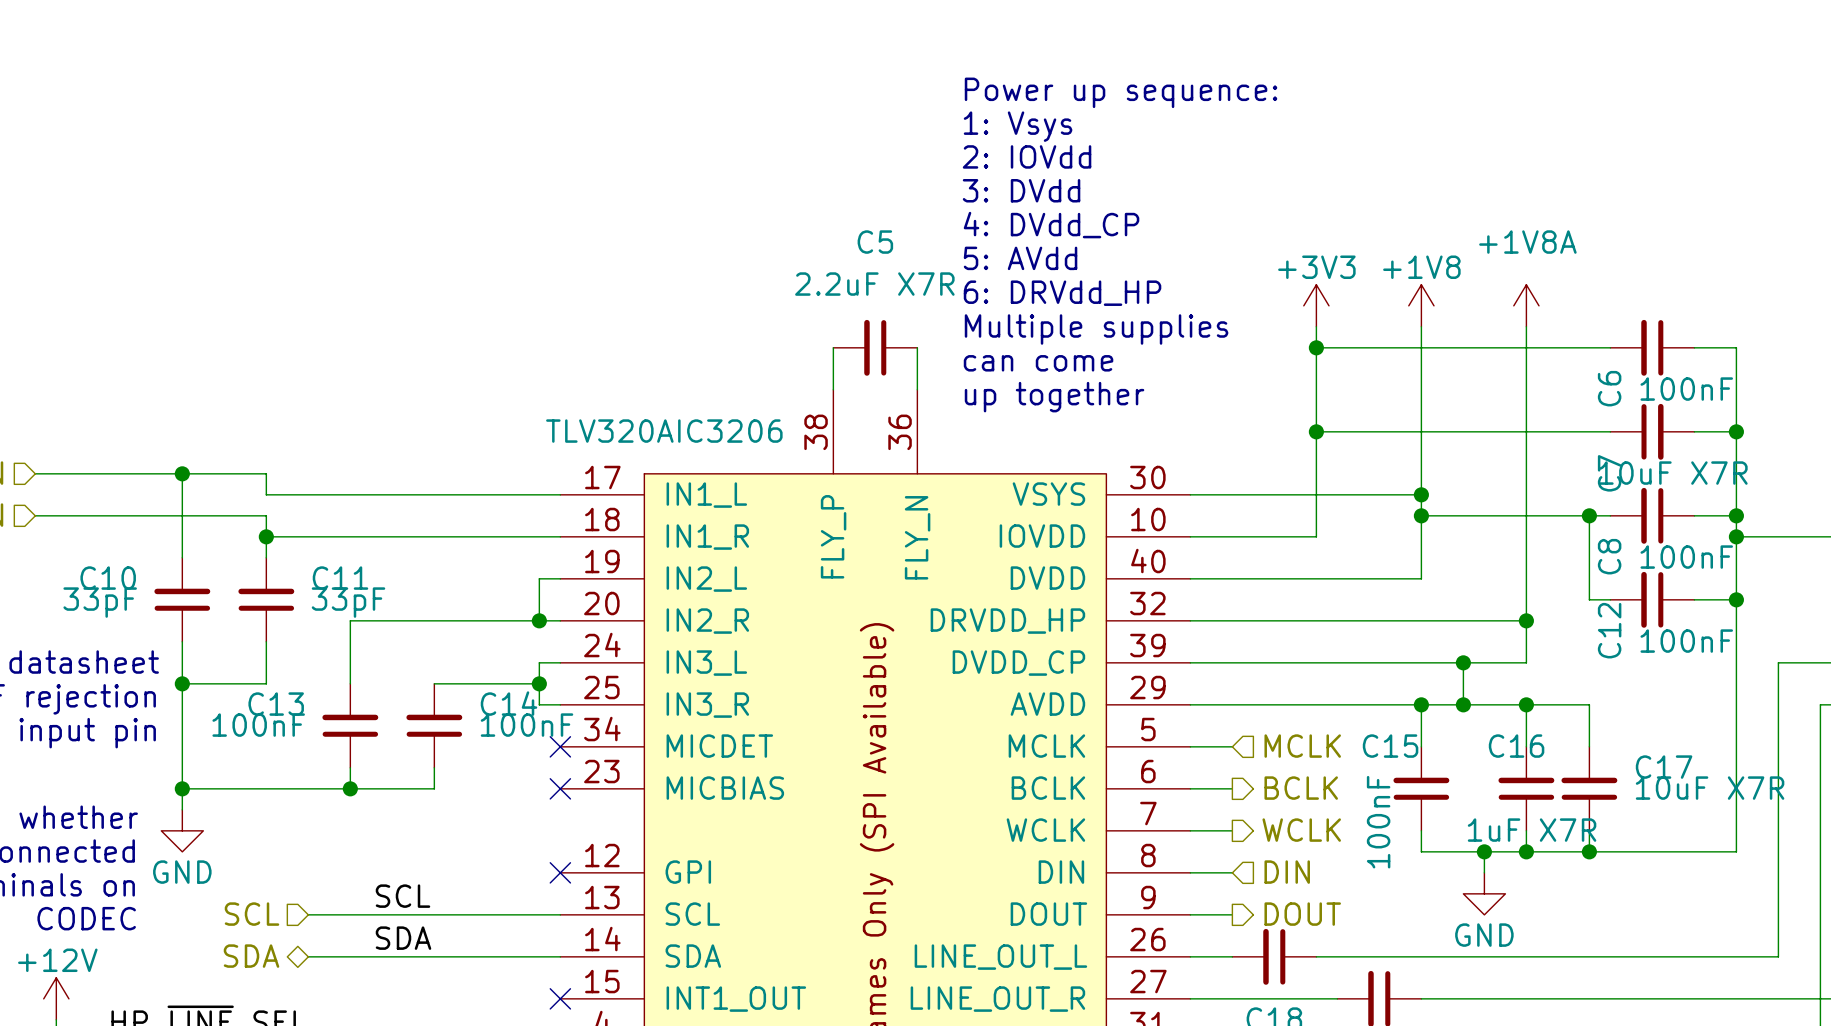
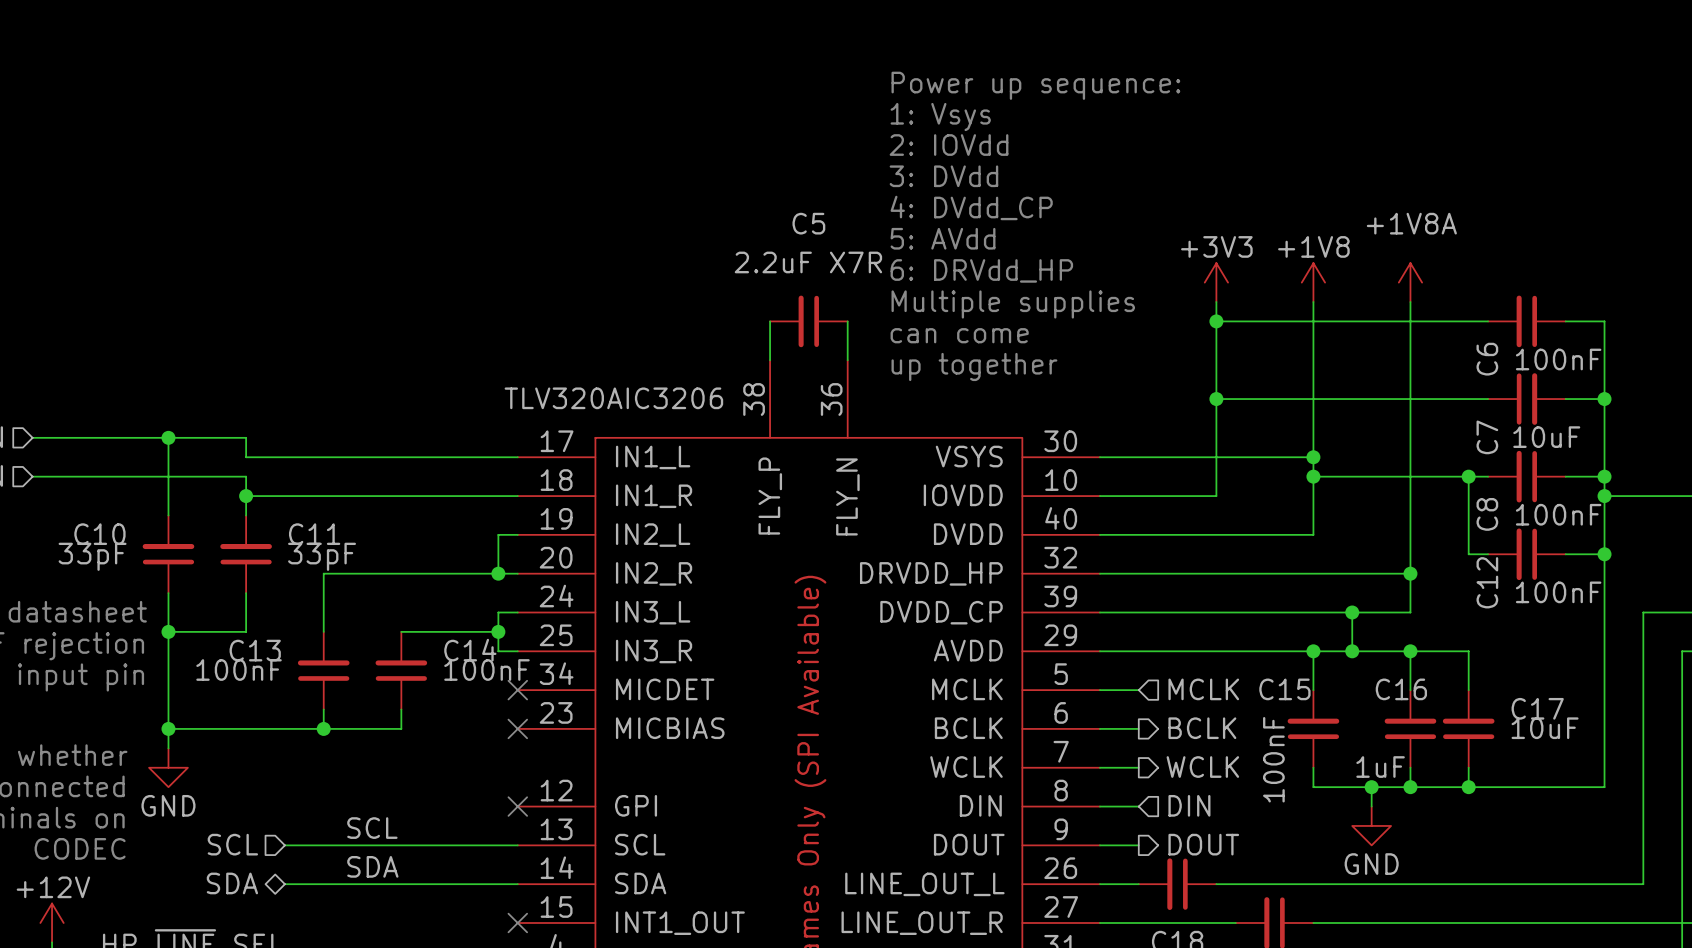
C7 value: 10uF X7R (1673, 473) -> 10uF (1546, 437)
C17 value: 10uF X7R (1710, 788) -> 10uF (1545, 728)
C16 value: 1uF X7R (1532, 830) -> 1uF (1380, 767)

